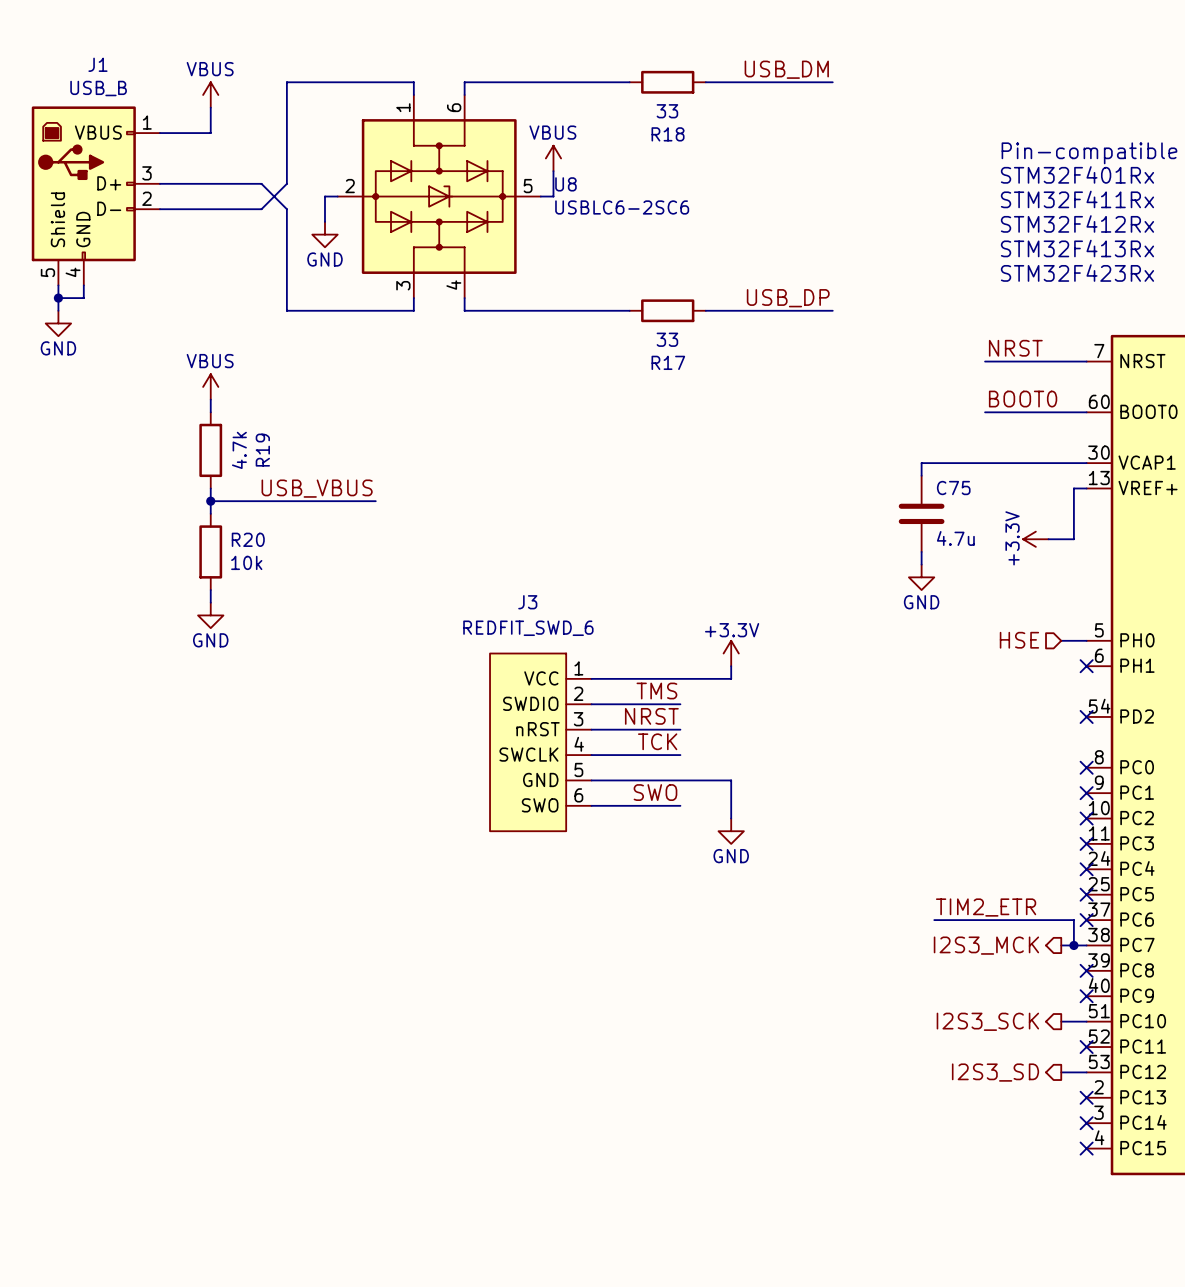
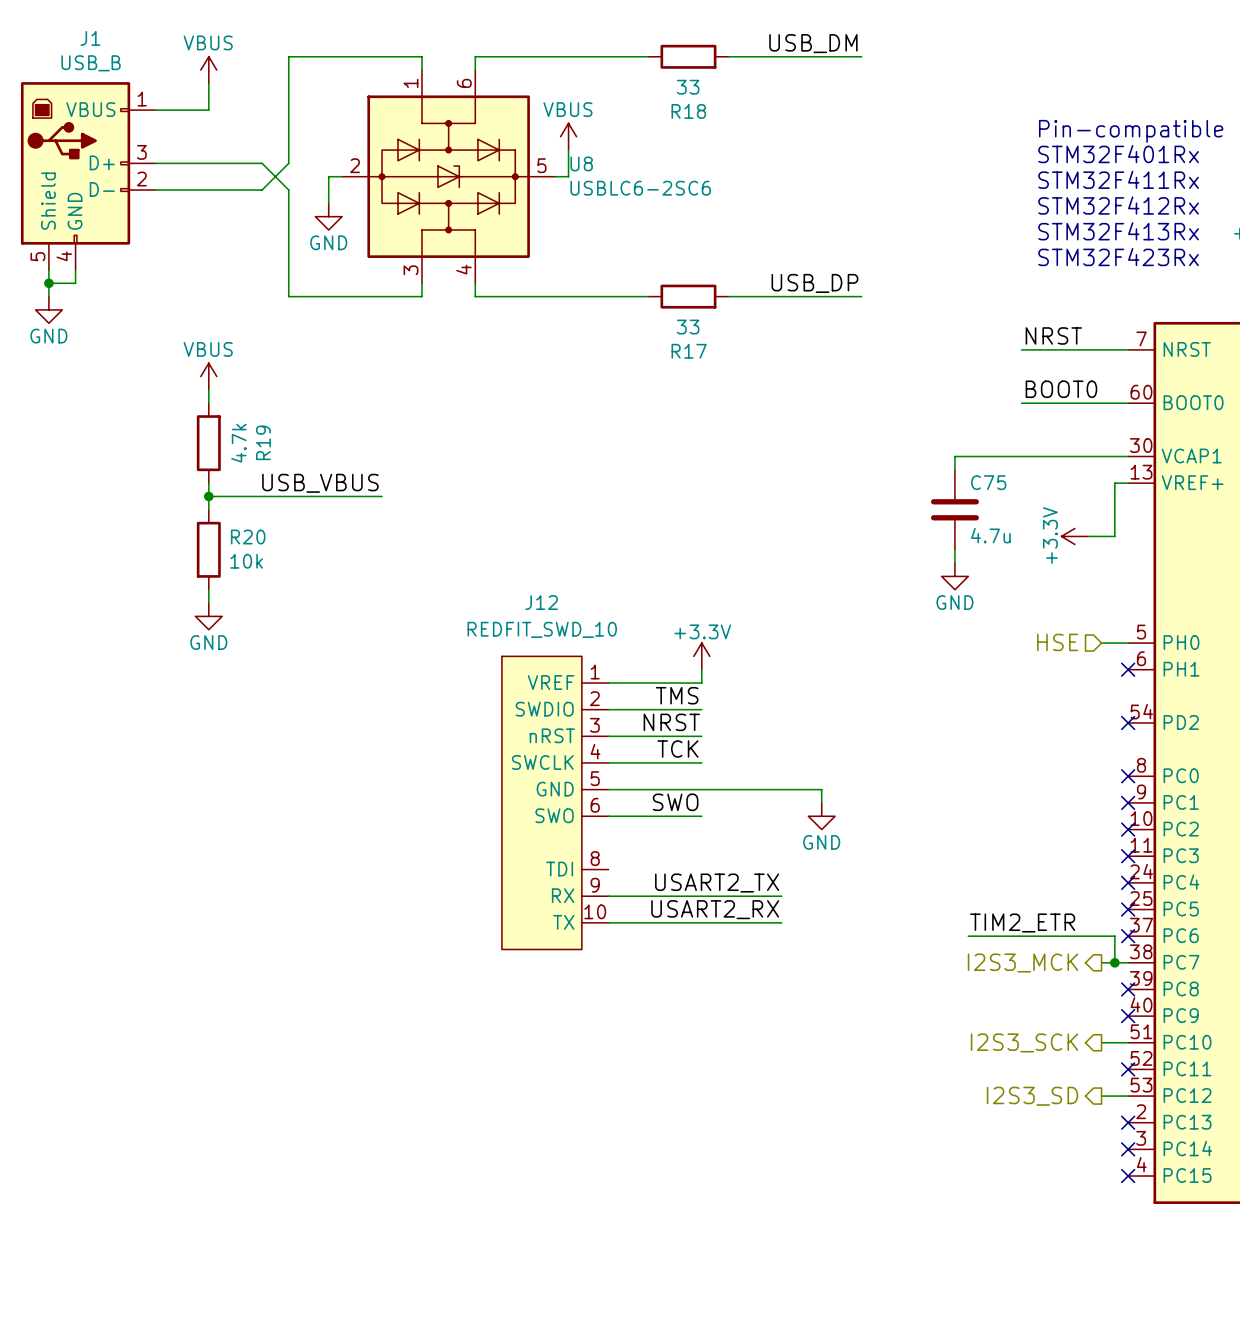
power symbol position: +3.3V (731, 653) -> +3.3V (701, 656)
wire: (731, 666) (731, 678) (680, 678) -> (701, 669) (701, 683)
J3: REDFIT_SWD_6 (540, 742) -> none
wire: (731, 780) (731, 818) -> (755, 789) (821, 789) (821, 802)
J12: none -> REDFIT_SWD_10 (555, 802)
power symbol position: GND (731, 831) -> GND (821, 816)
label: none -> USART2_TX (717, 883)
wire: none -> (608, 896) (781, 896)
label: none -> USART2_RX (715, 909)
wire: none -> (608, 922) (781, 922)

